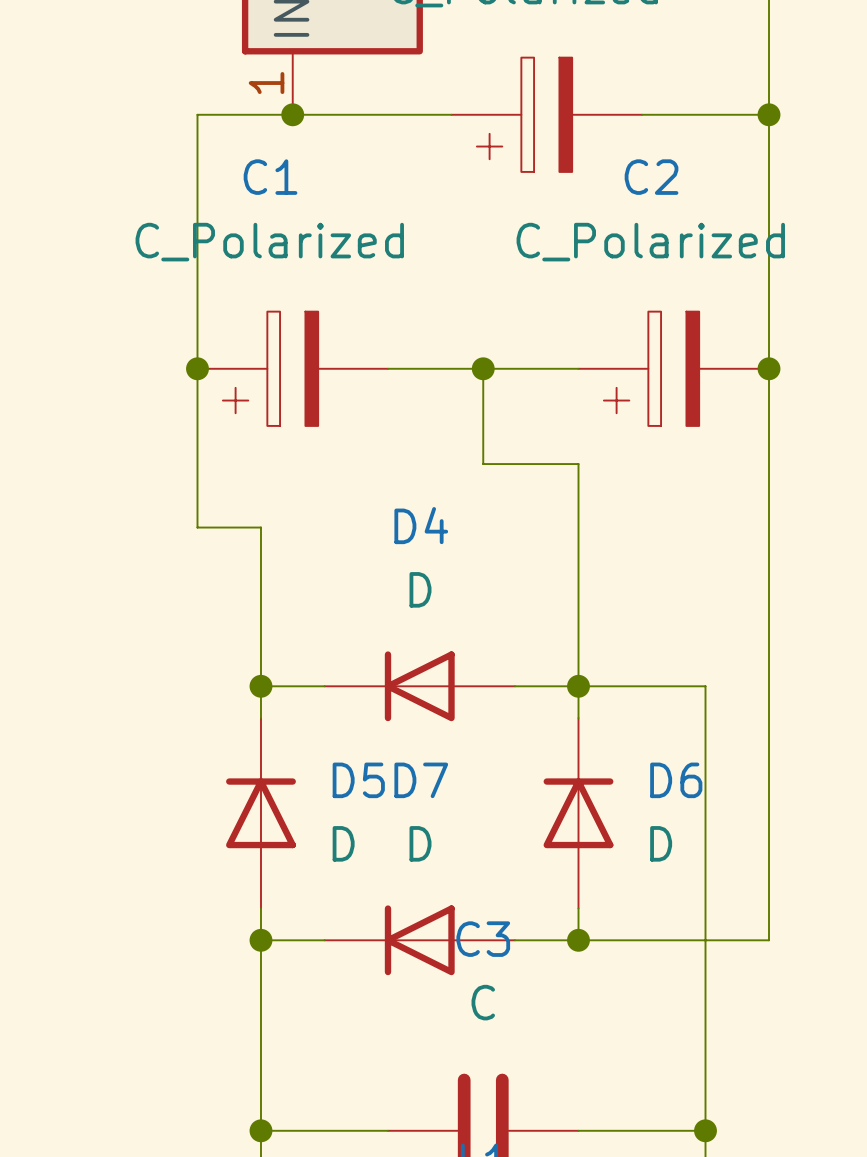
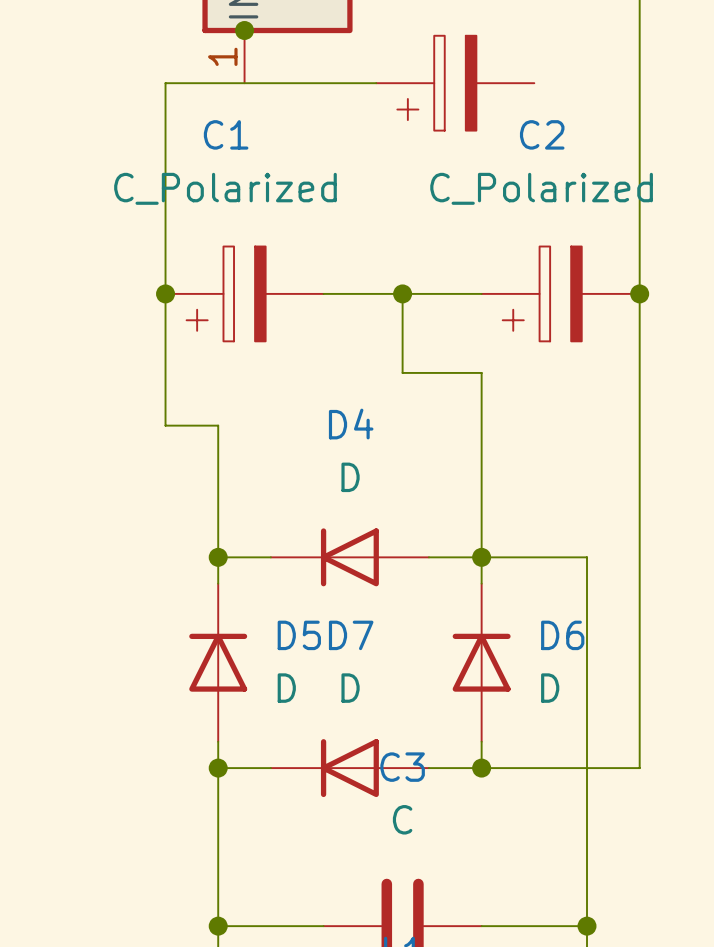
junction position: (292, 114) -> (244, 30)
wire: (642, 114) (769, 114) -> none
junction: (769, 114) -> none

